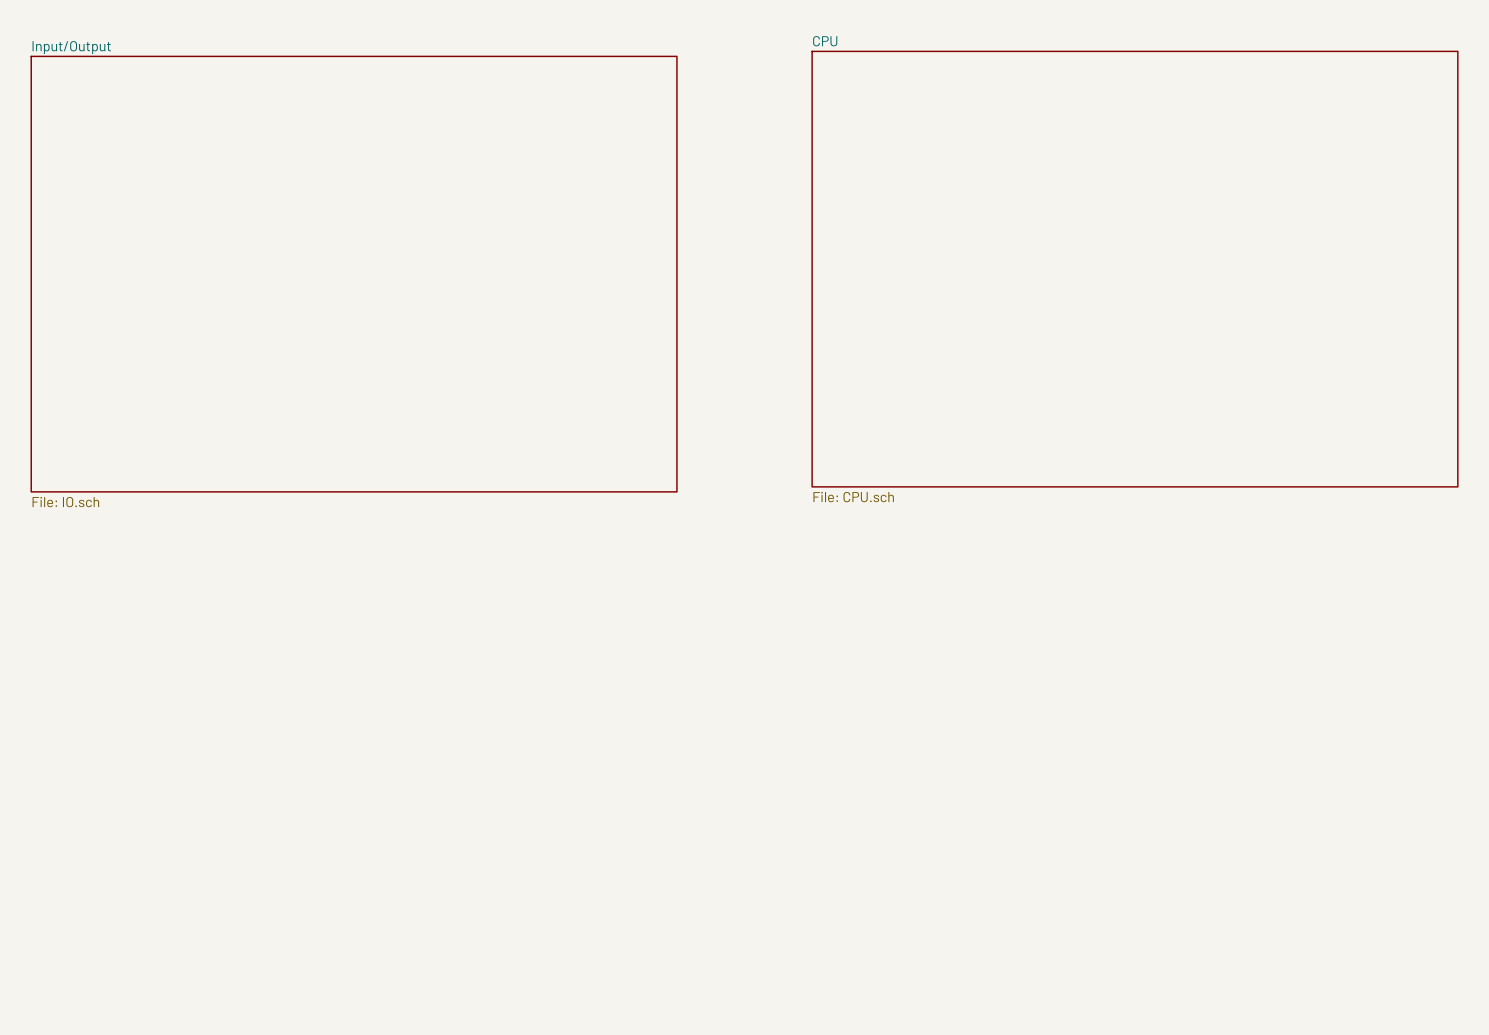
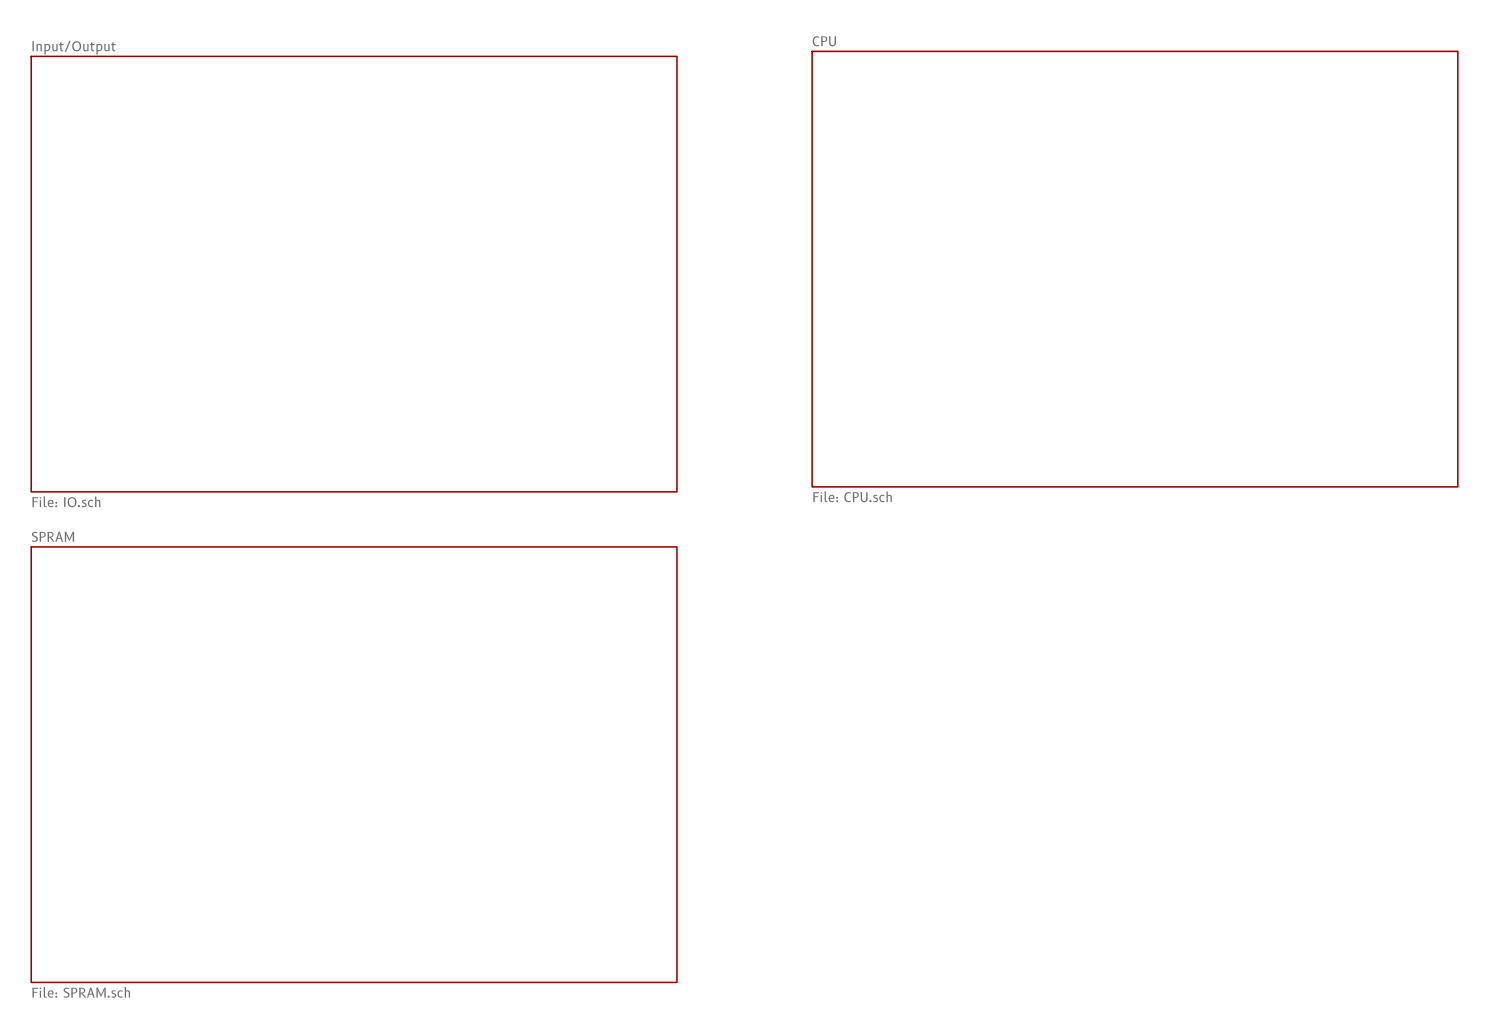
sheet SPRAM: none -> File: SPRAM.sch (354, 764)

